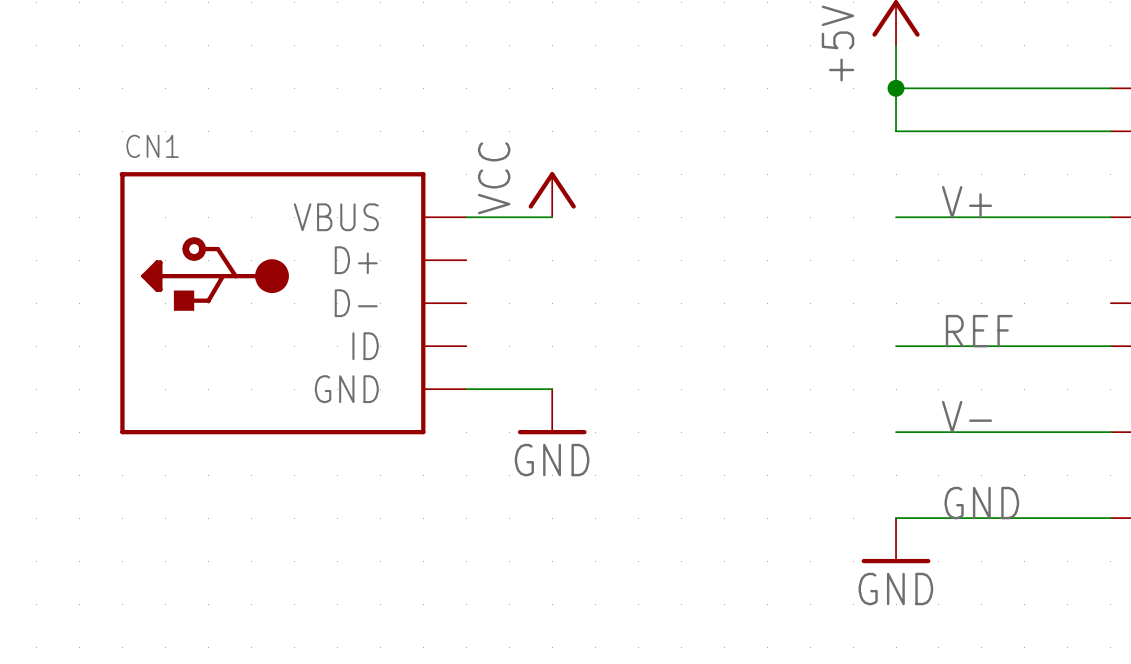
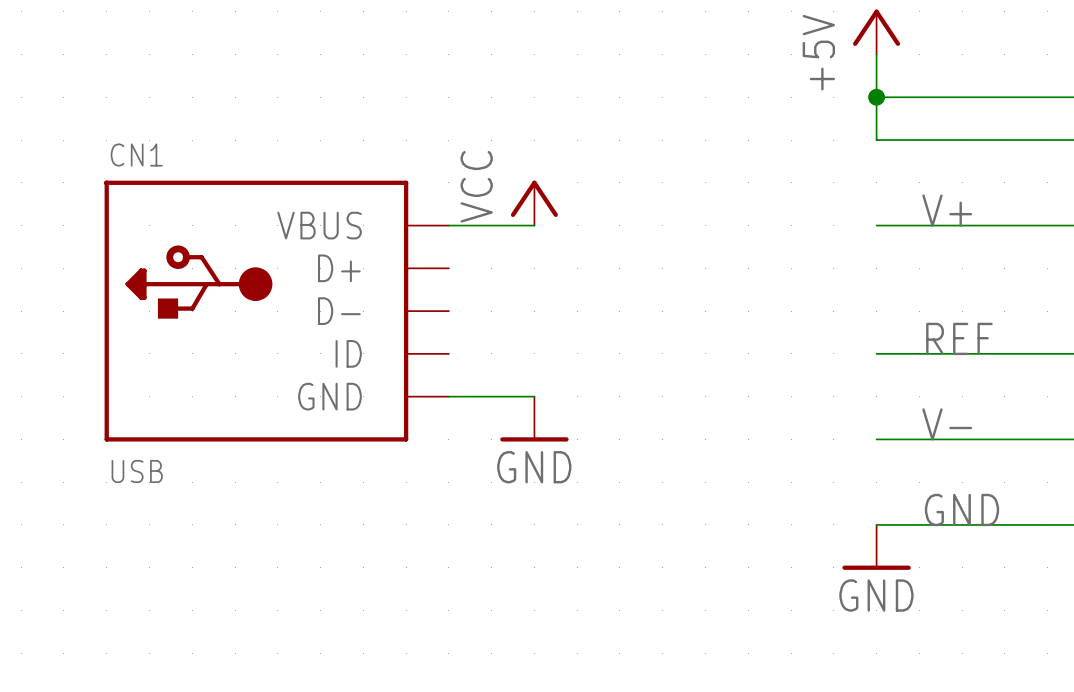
CN1 value: none -> USB (137, 471)

